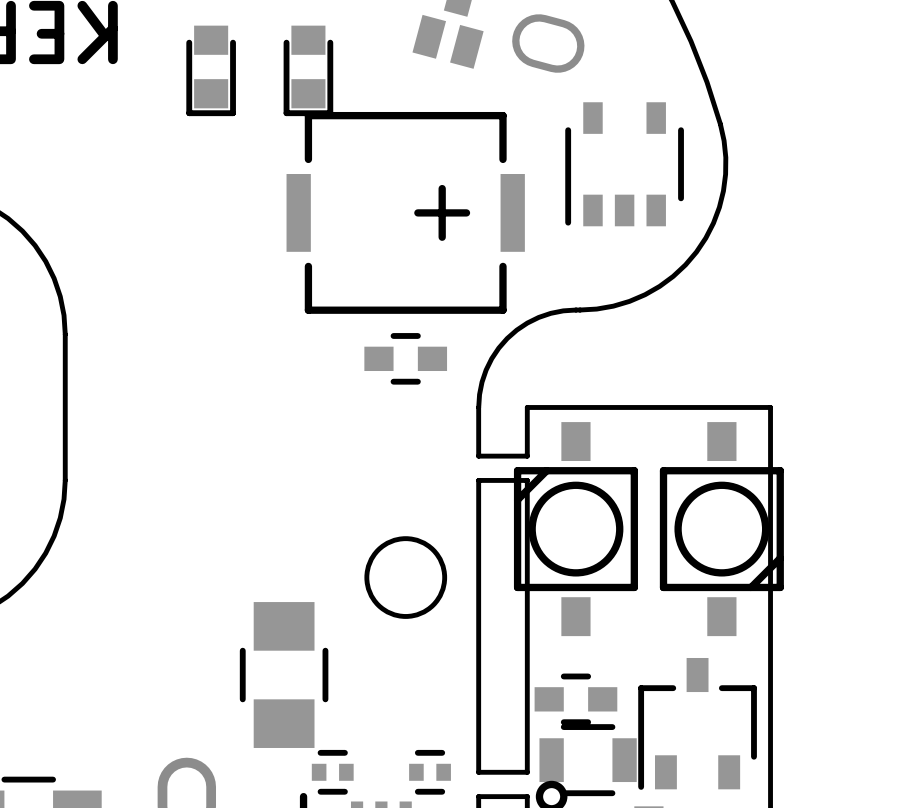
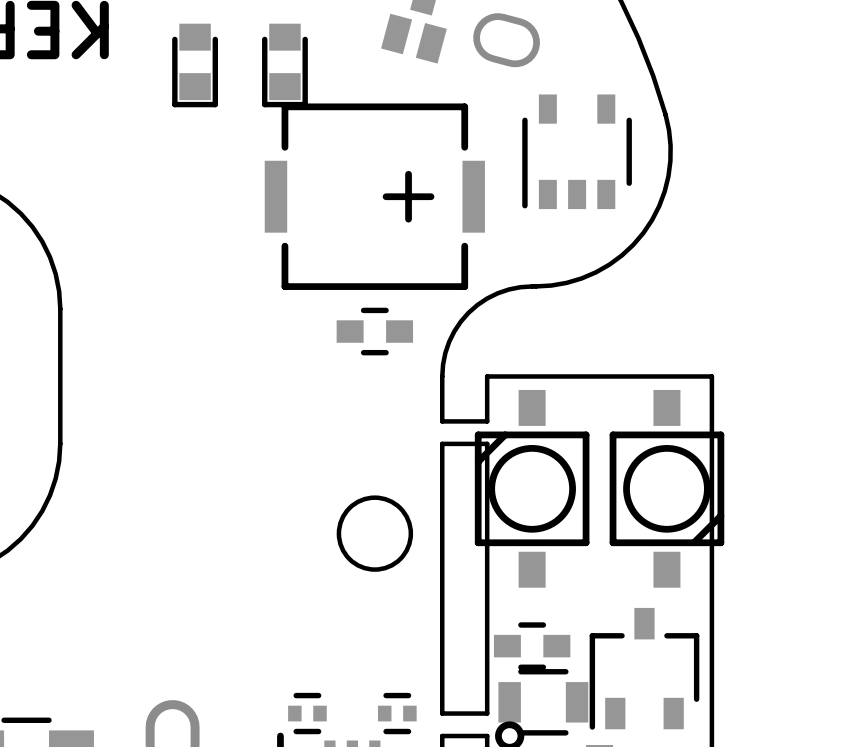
part: (284, 675) -> none

